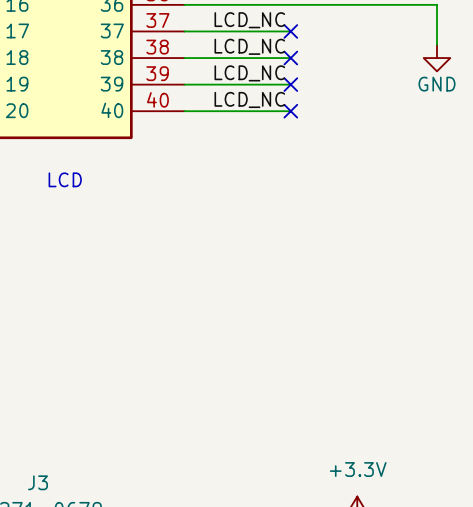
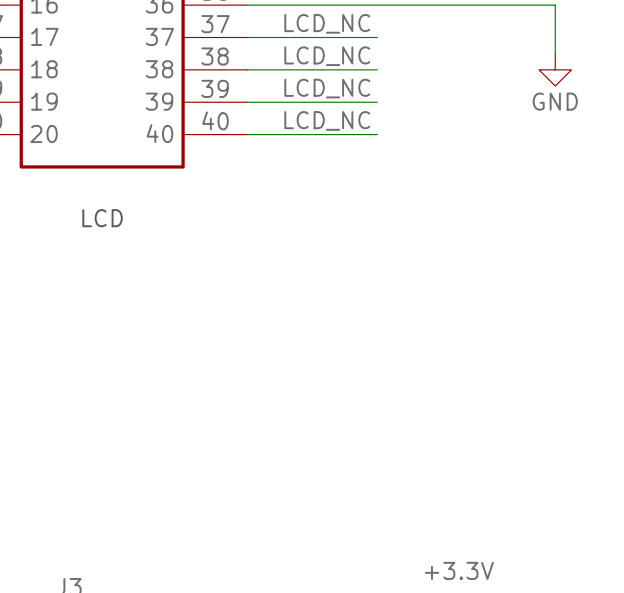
no-connect mark: (290, 31) -> none
no-connect mark: (290, 58) -> none
no-connect mark: (290, 84) -> none
no-connect mark: (290, 111) -> none

